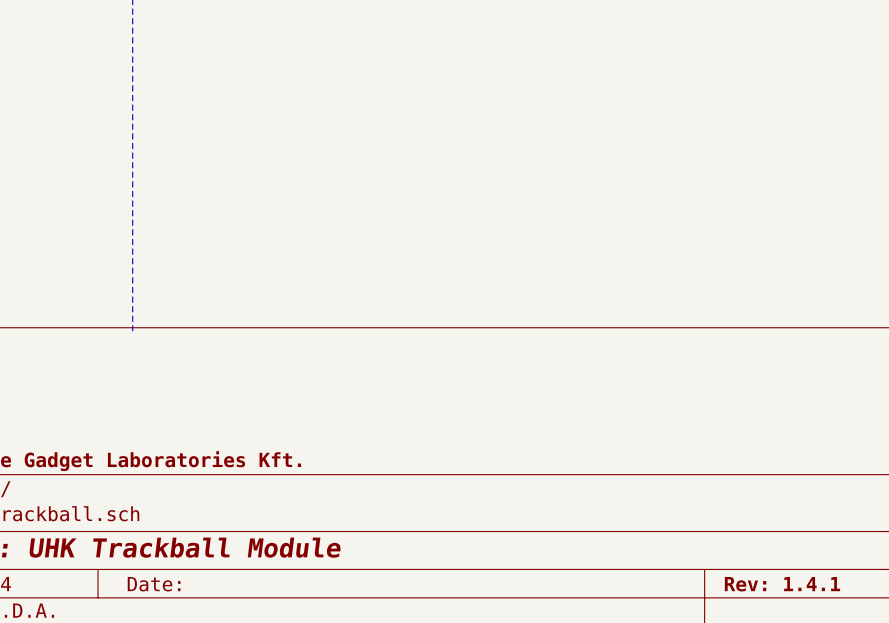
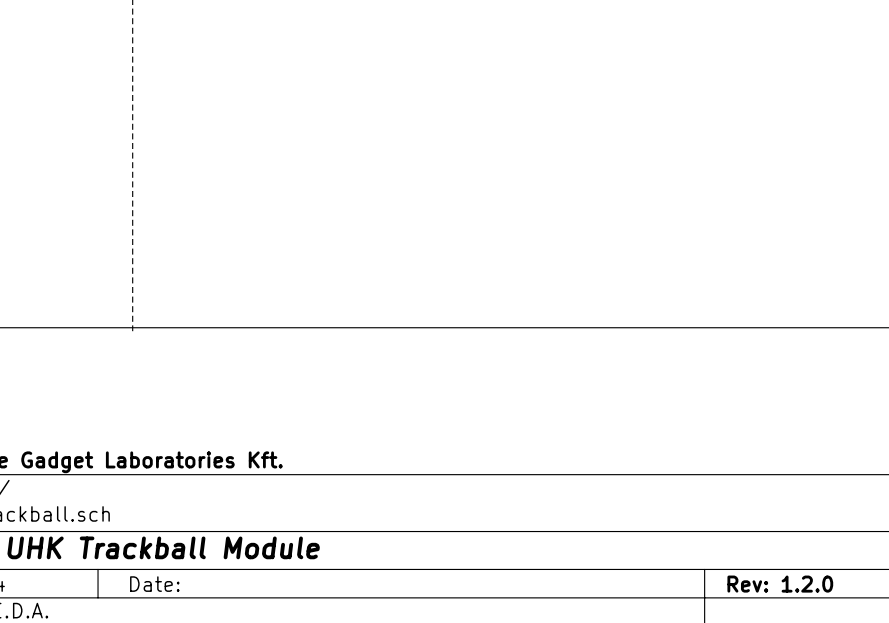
title block: Rev: 1.4.1 (782, 584) -> Rev: 1.2.0 (780, 584)

